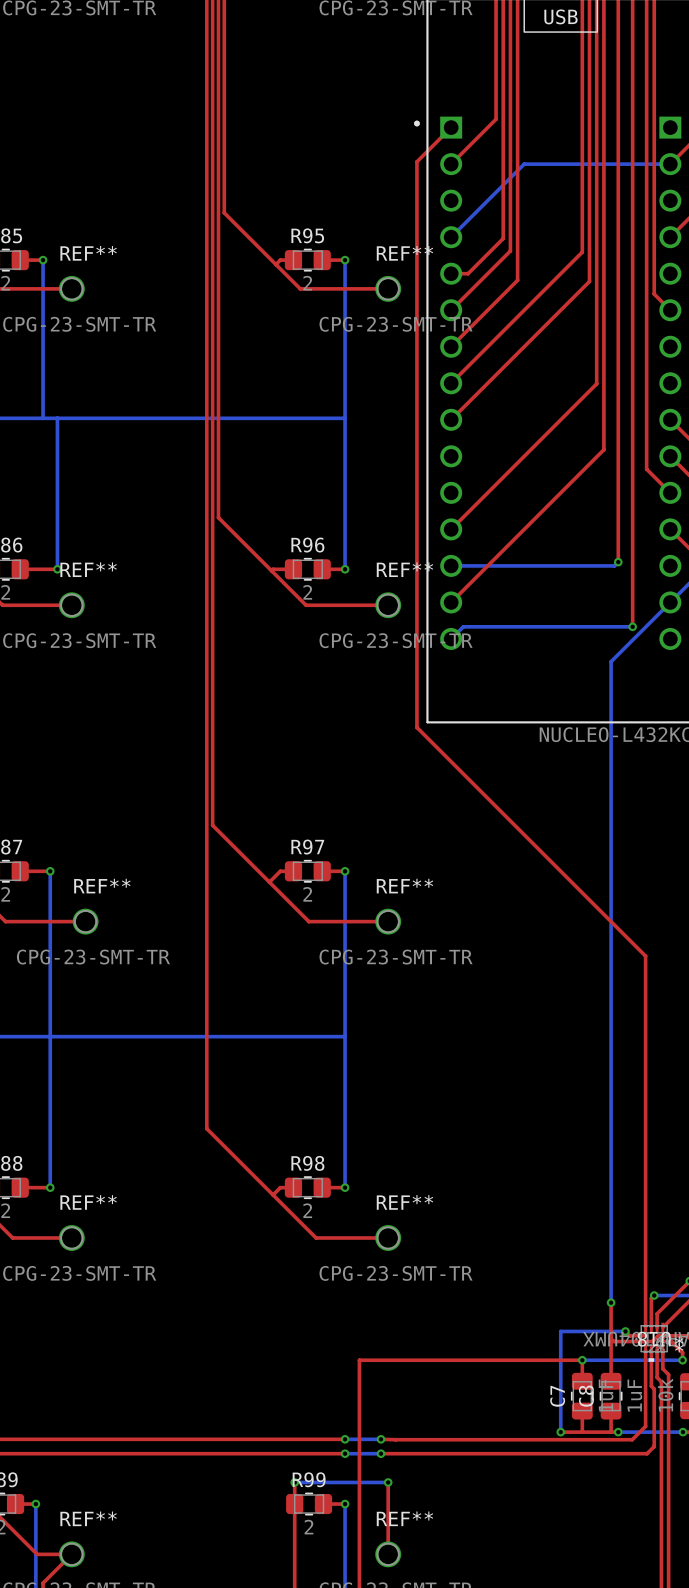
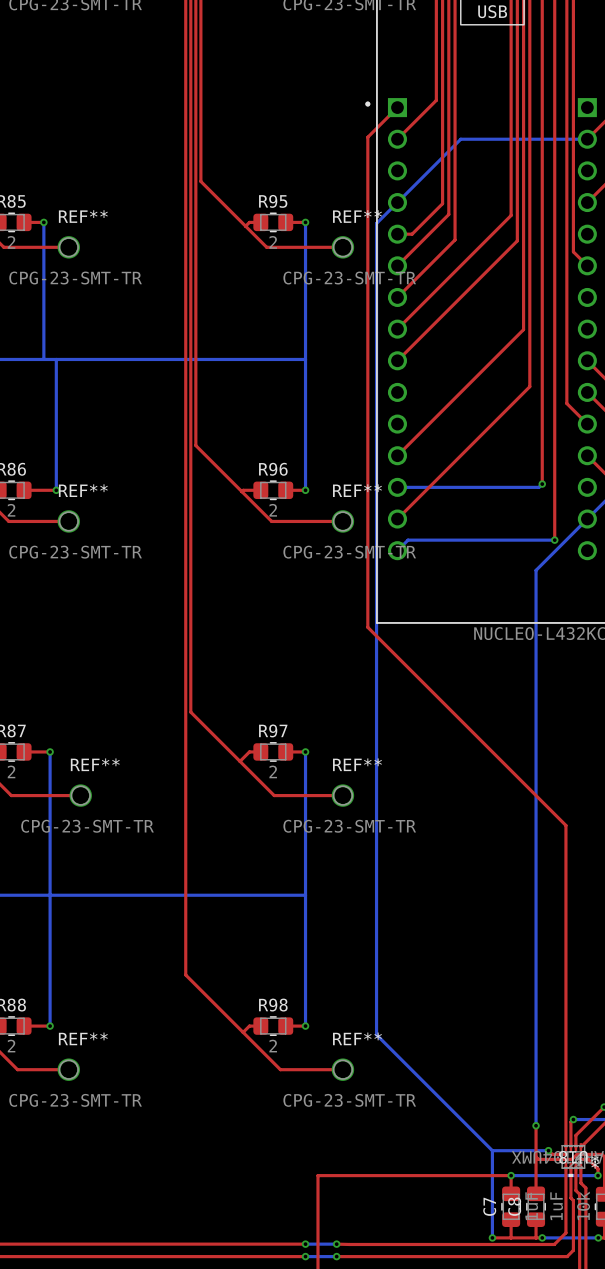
bottom track: none -> (397, 202) (376, 223) (376, 1034) (492, 1150)

